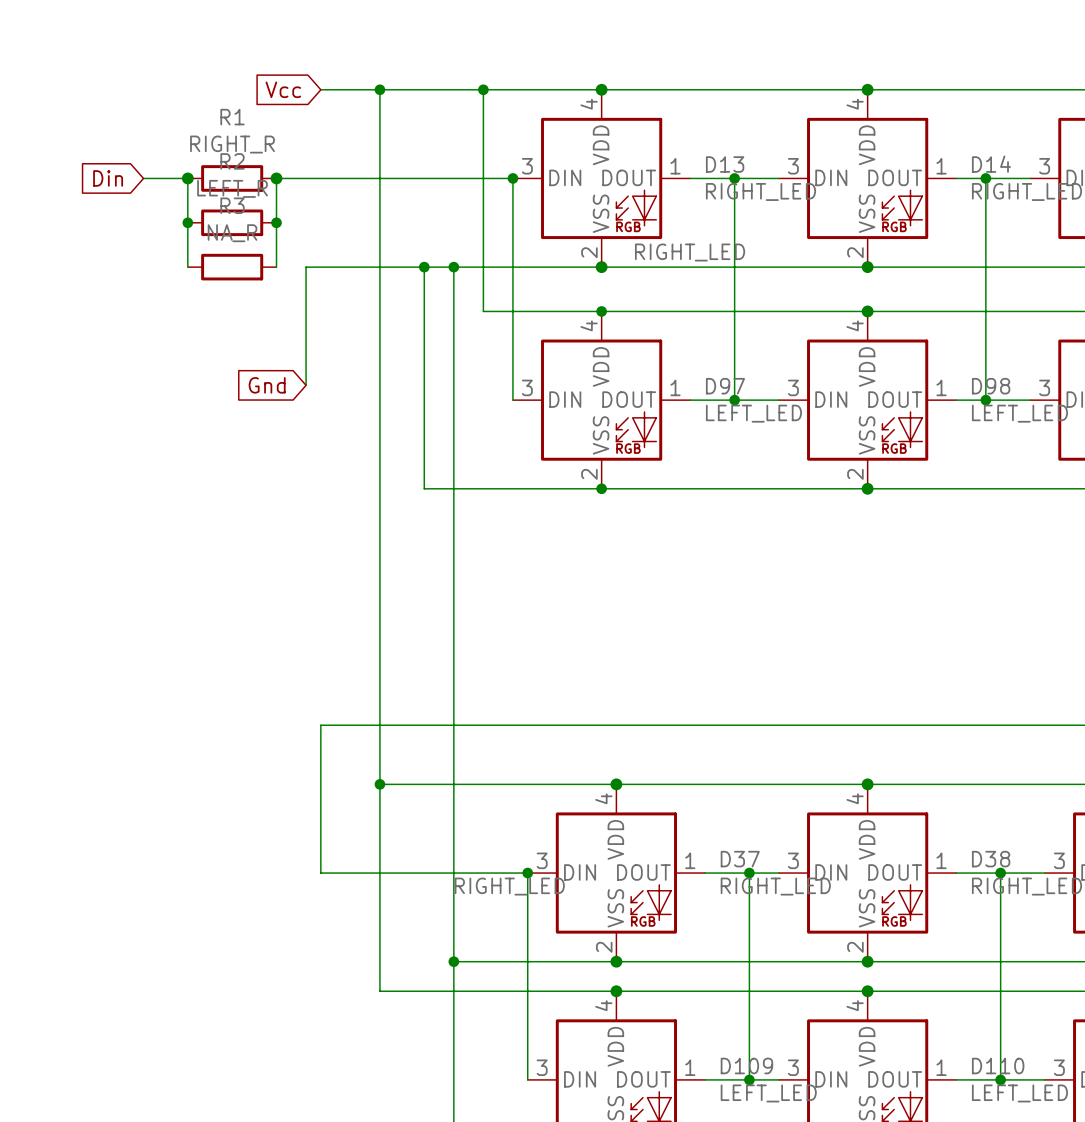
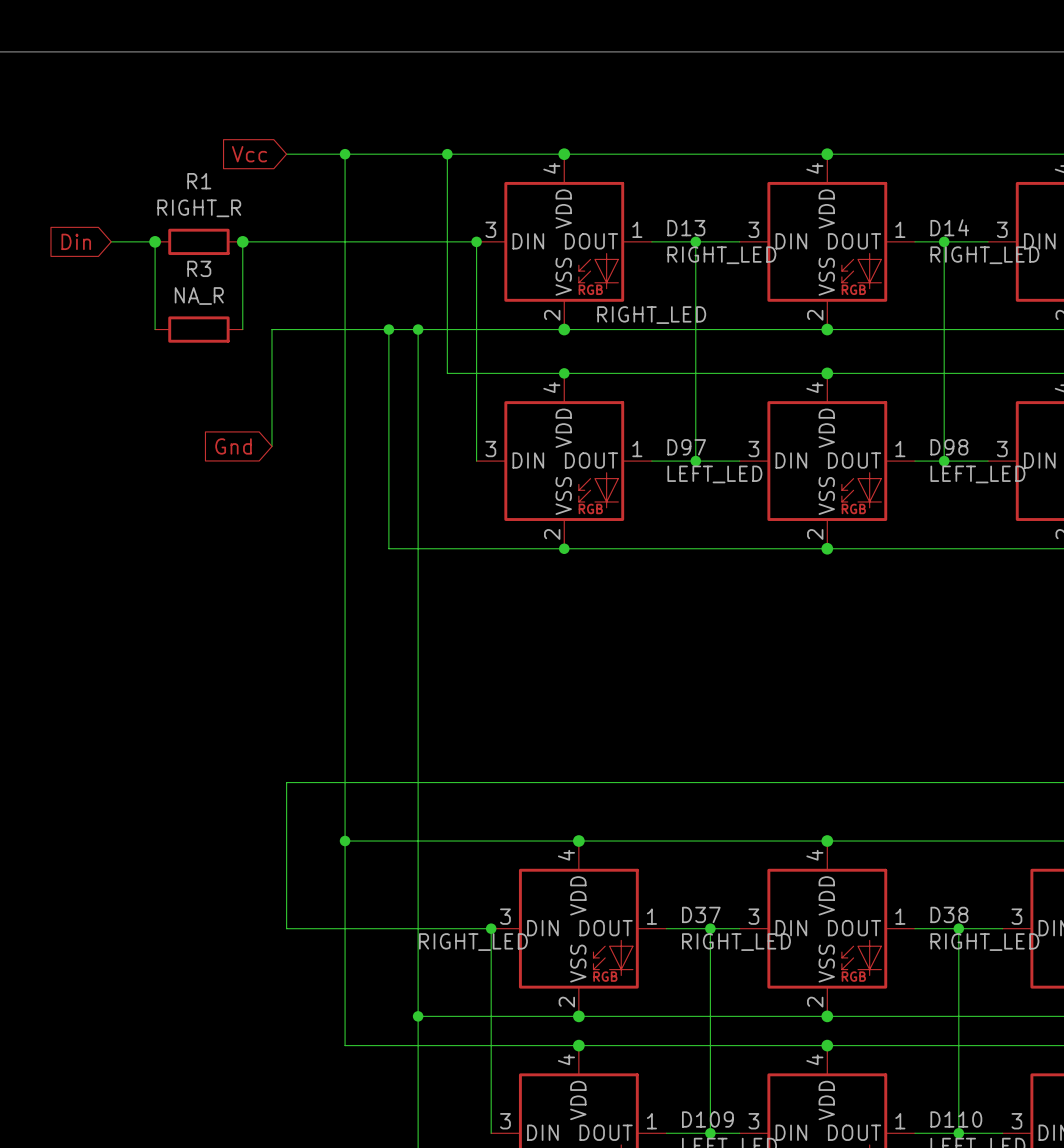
junction: (187, 222) -> none
R2: LEFT_R (232, 222) -> none
junction: (276, 222) -> none

